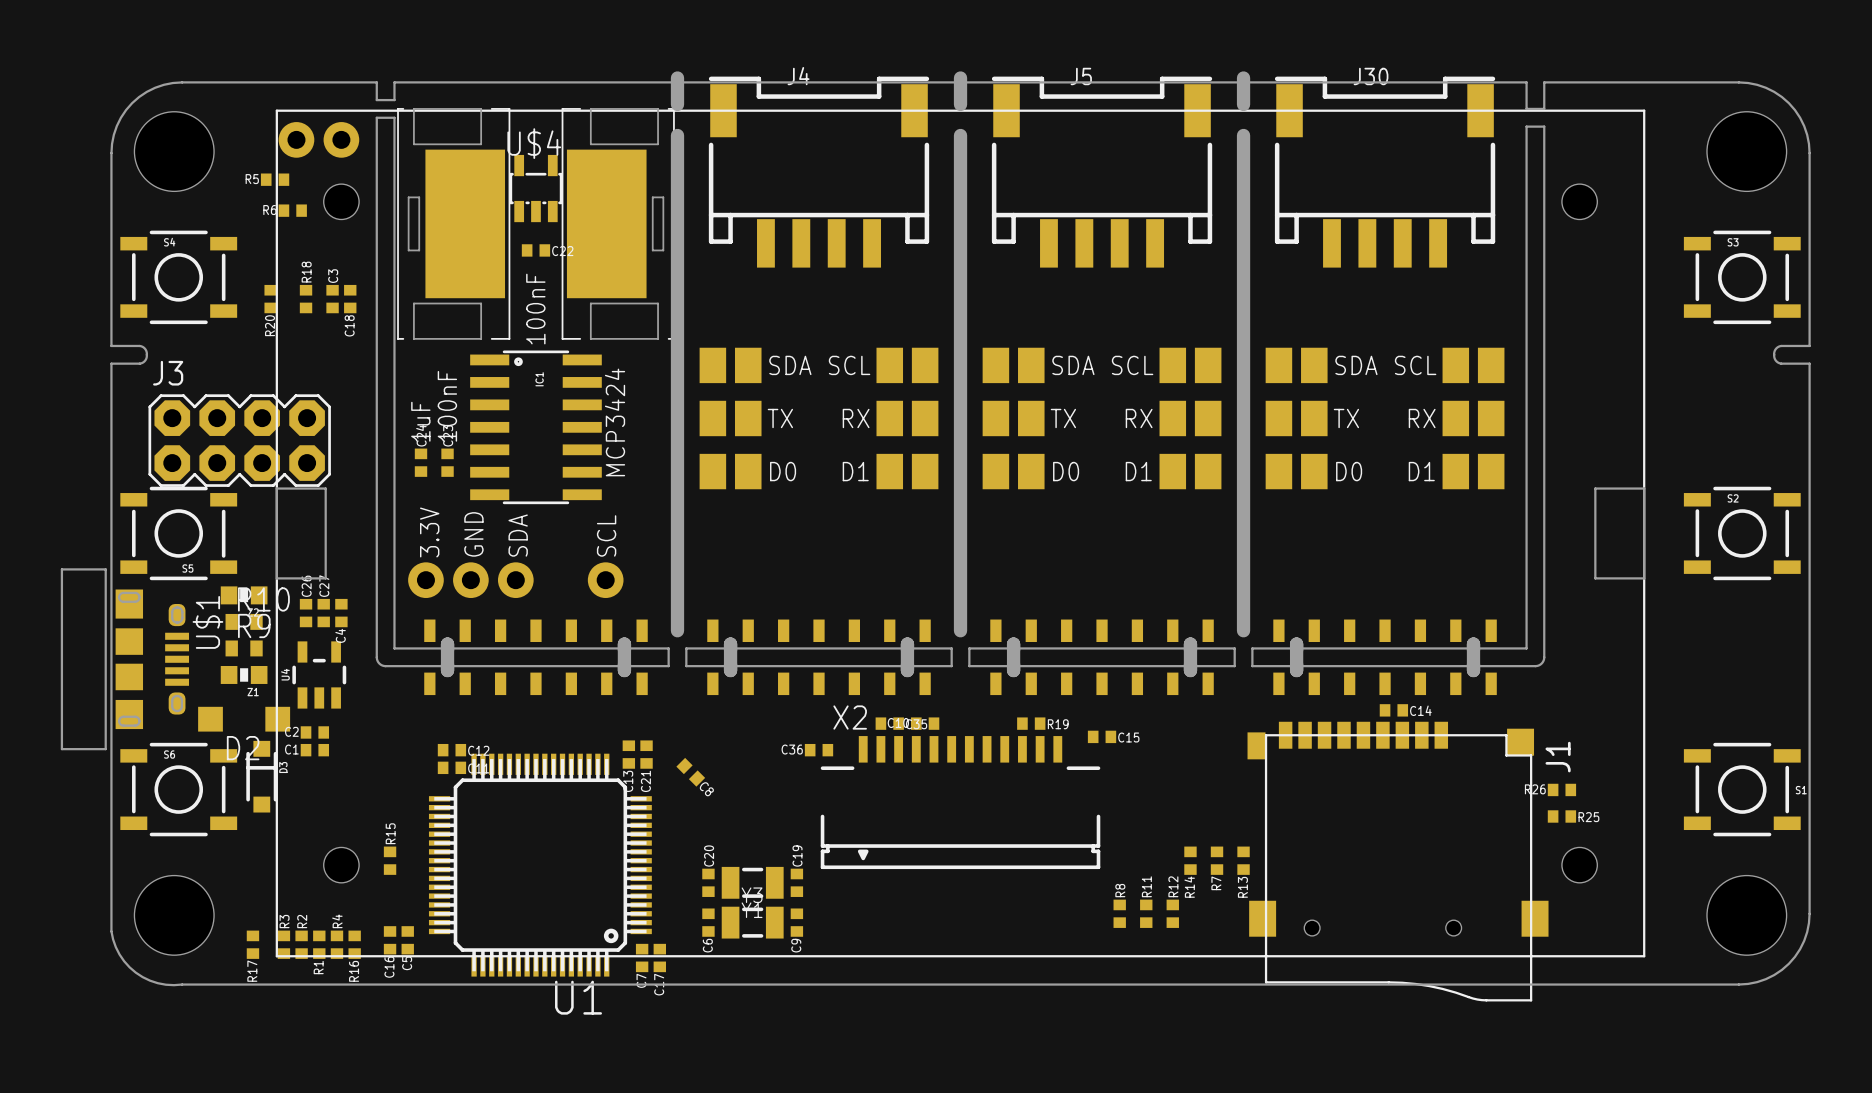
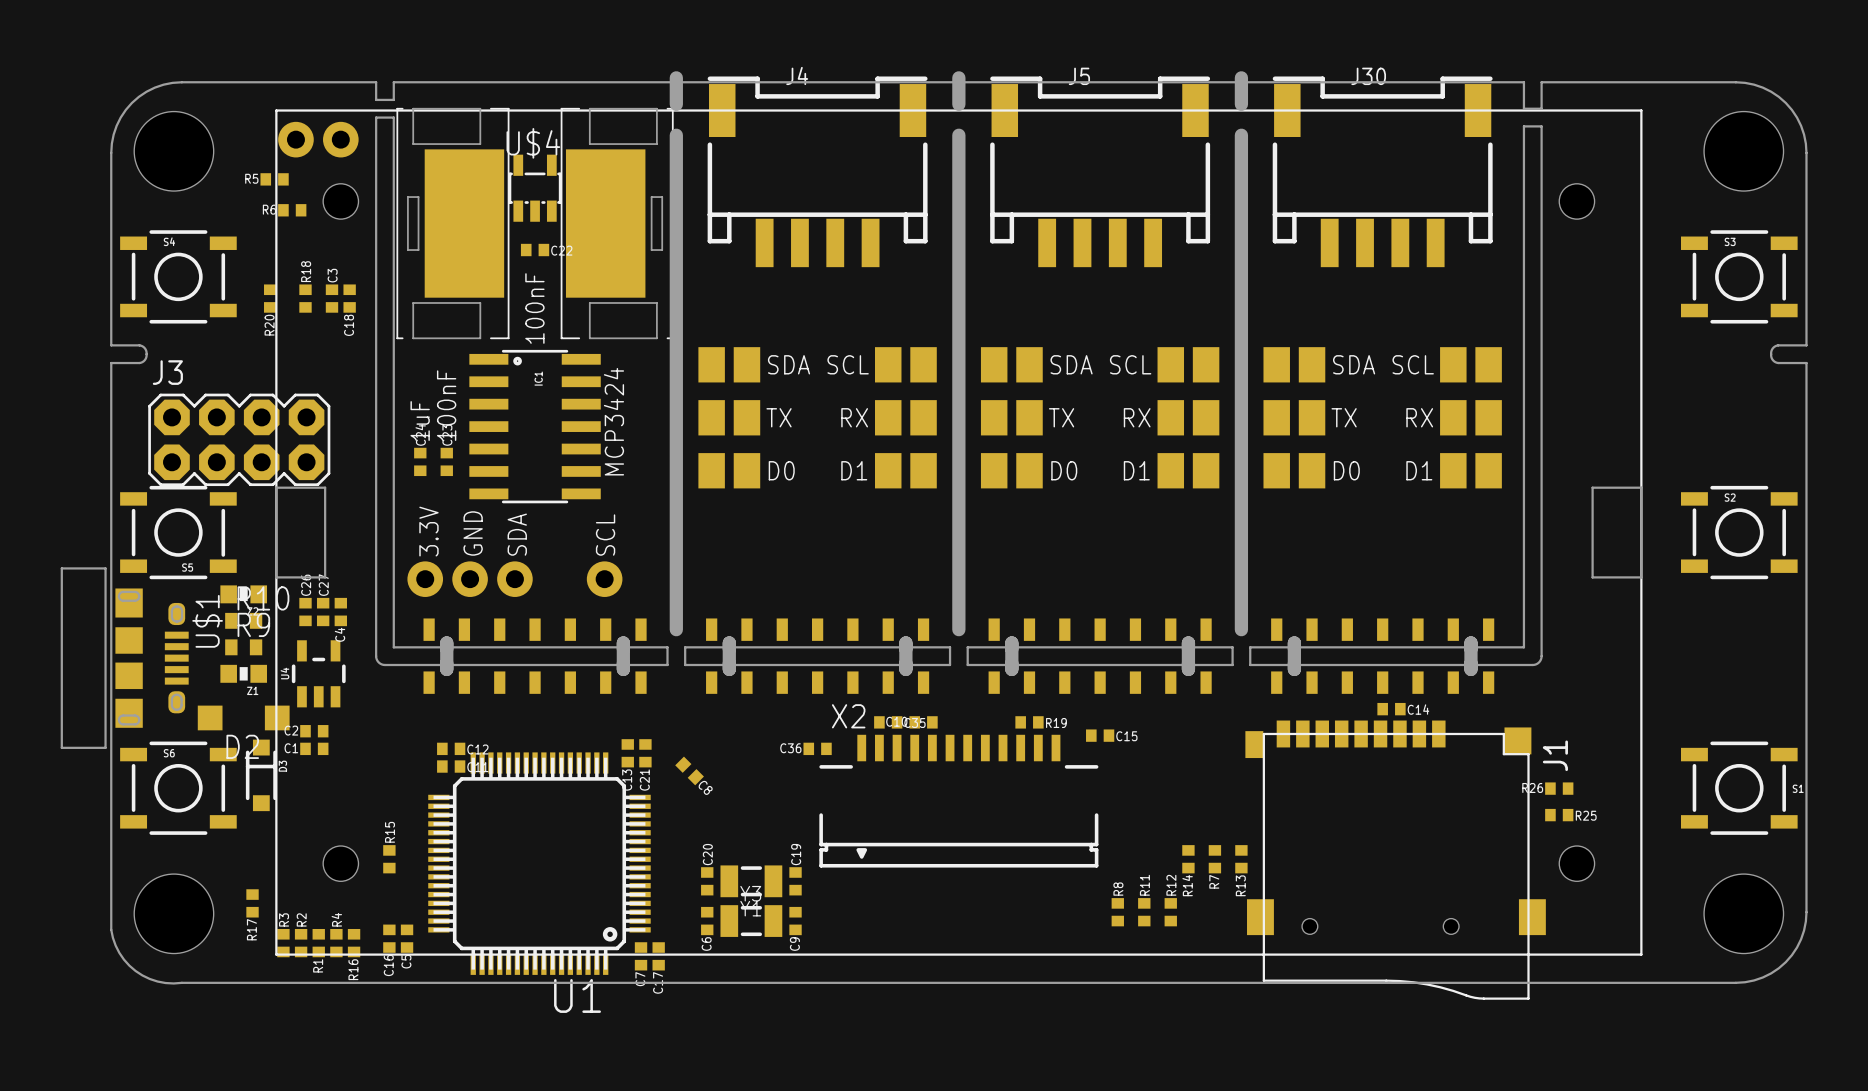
R17 position: (252, 944) -> (252, 903)

